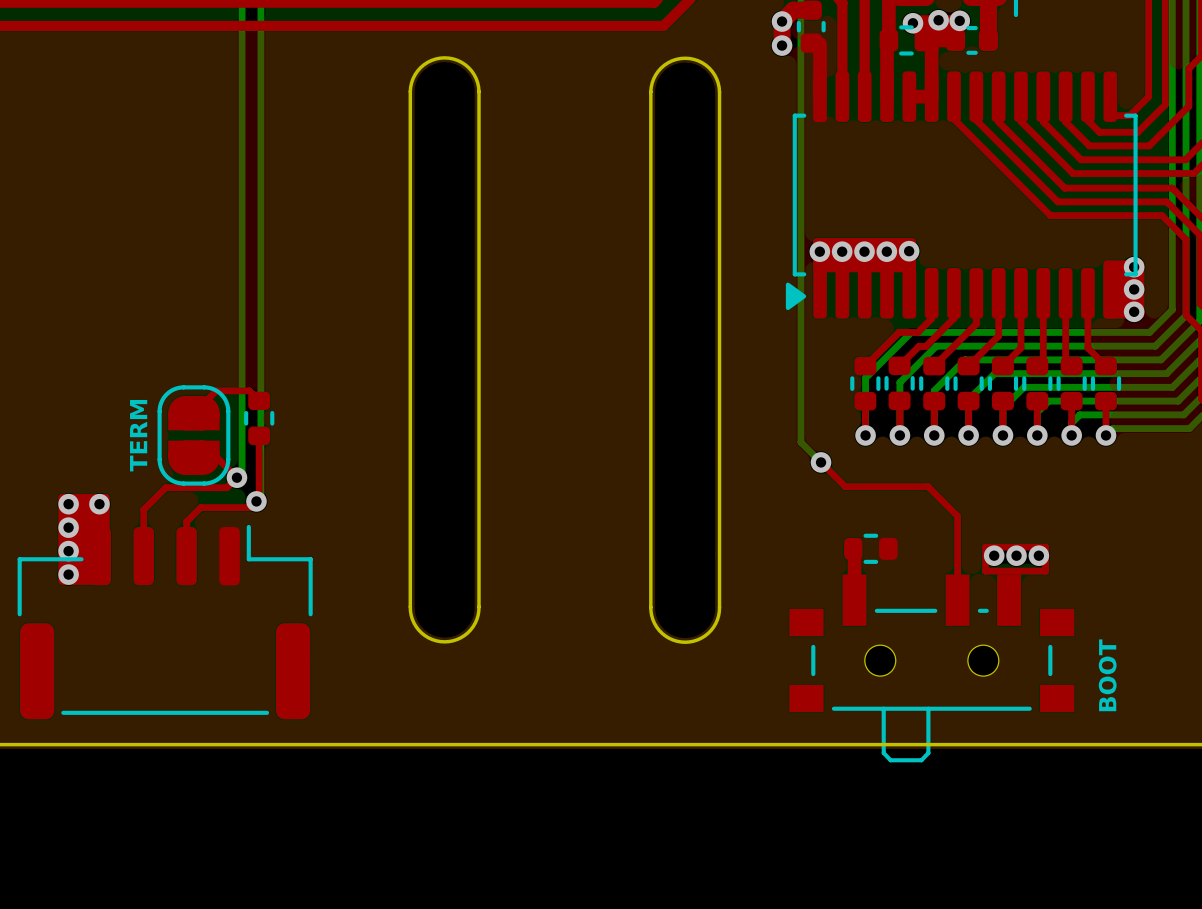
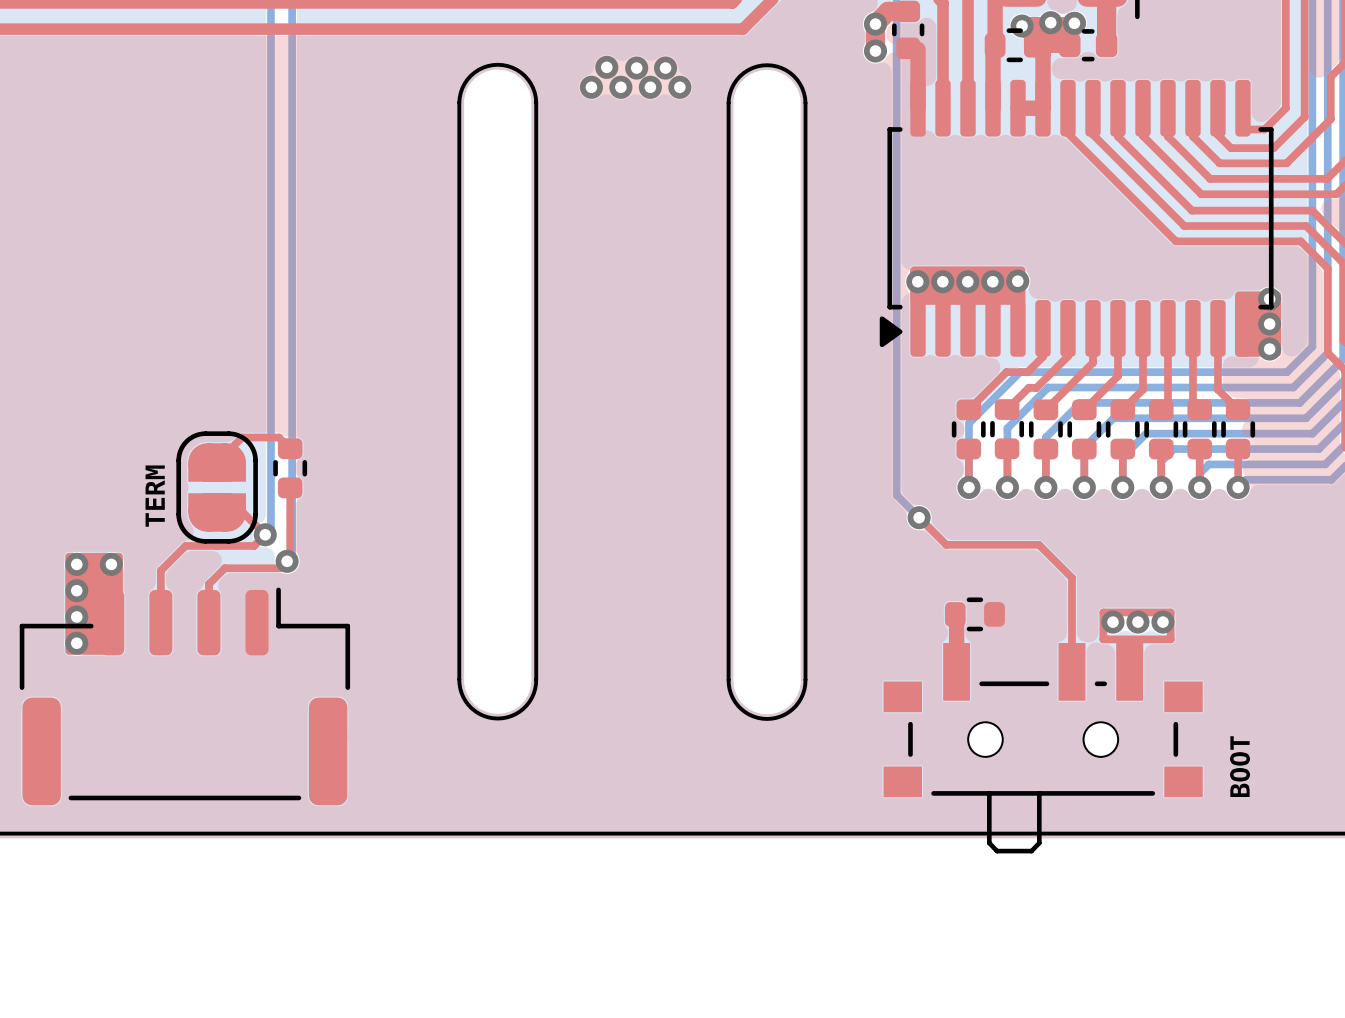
via: none -> (606, 67)
via: none -> (636, 68)
via: none -> (665, 68)
via: none -> (591, 87)
via: none -> (620, 87)
via: none -> (650, 87)
via: none -> (679, 87)

